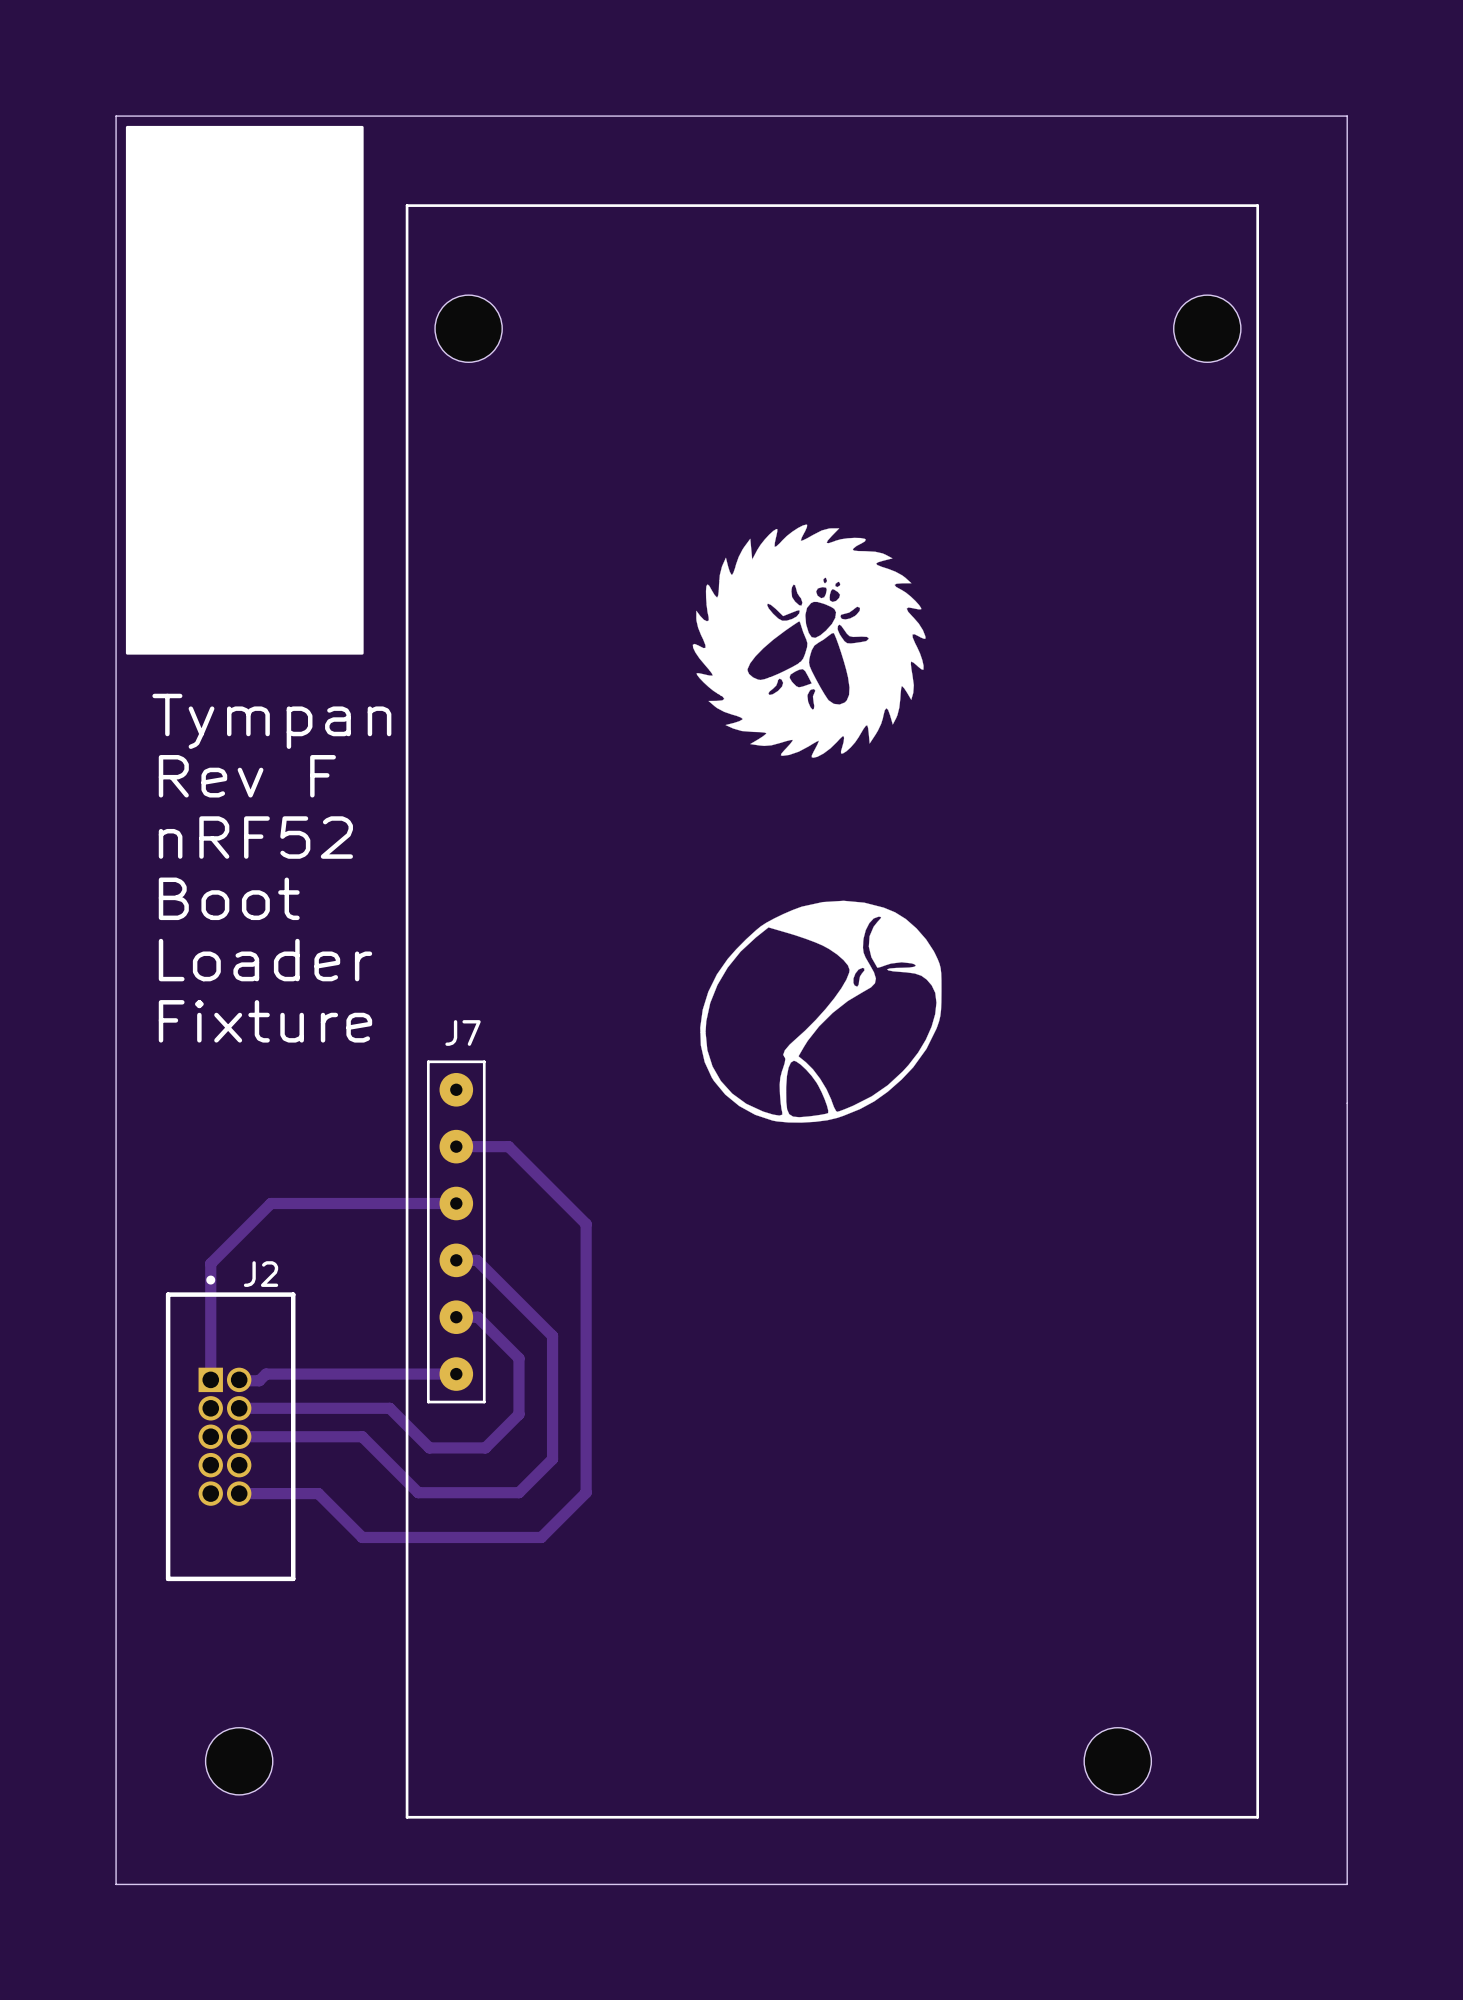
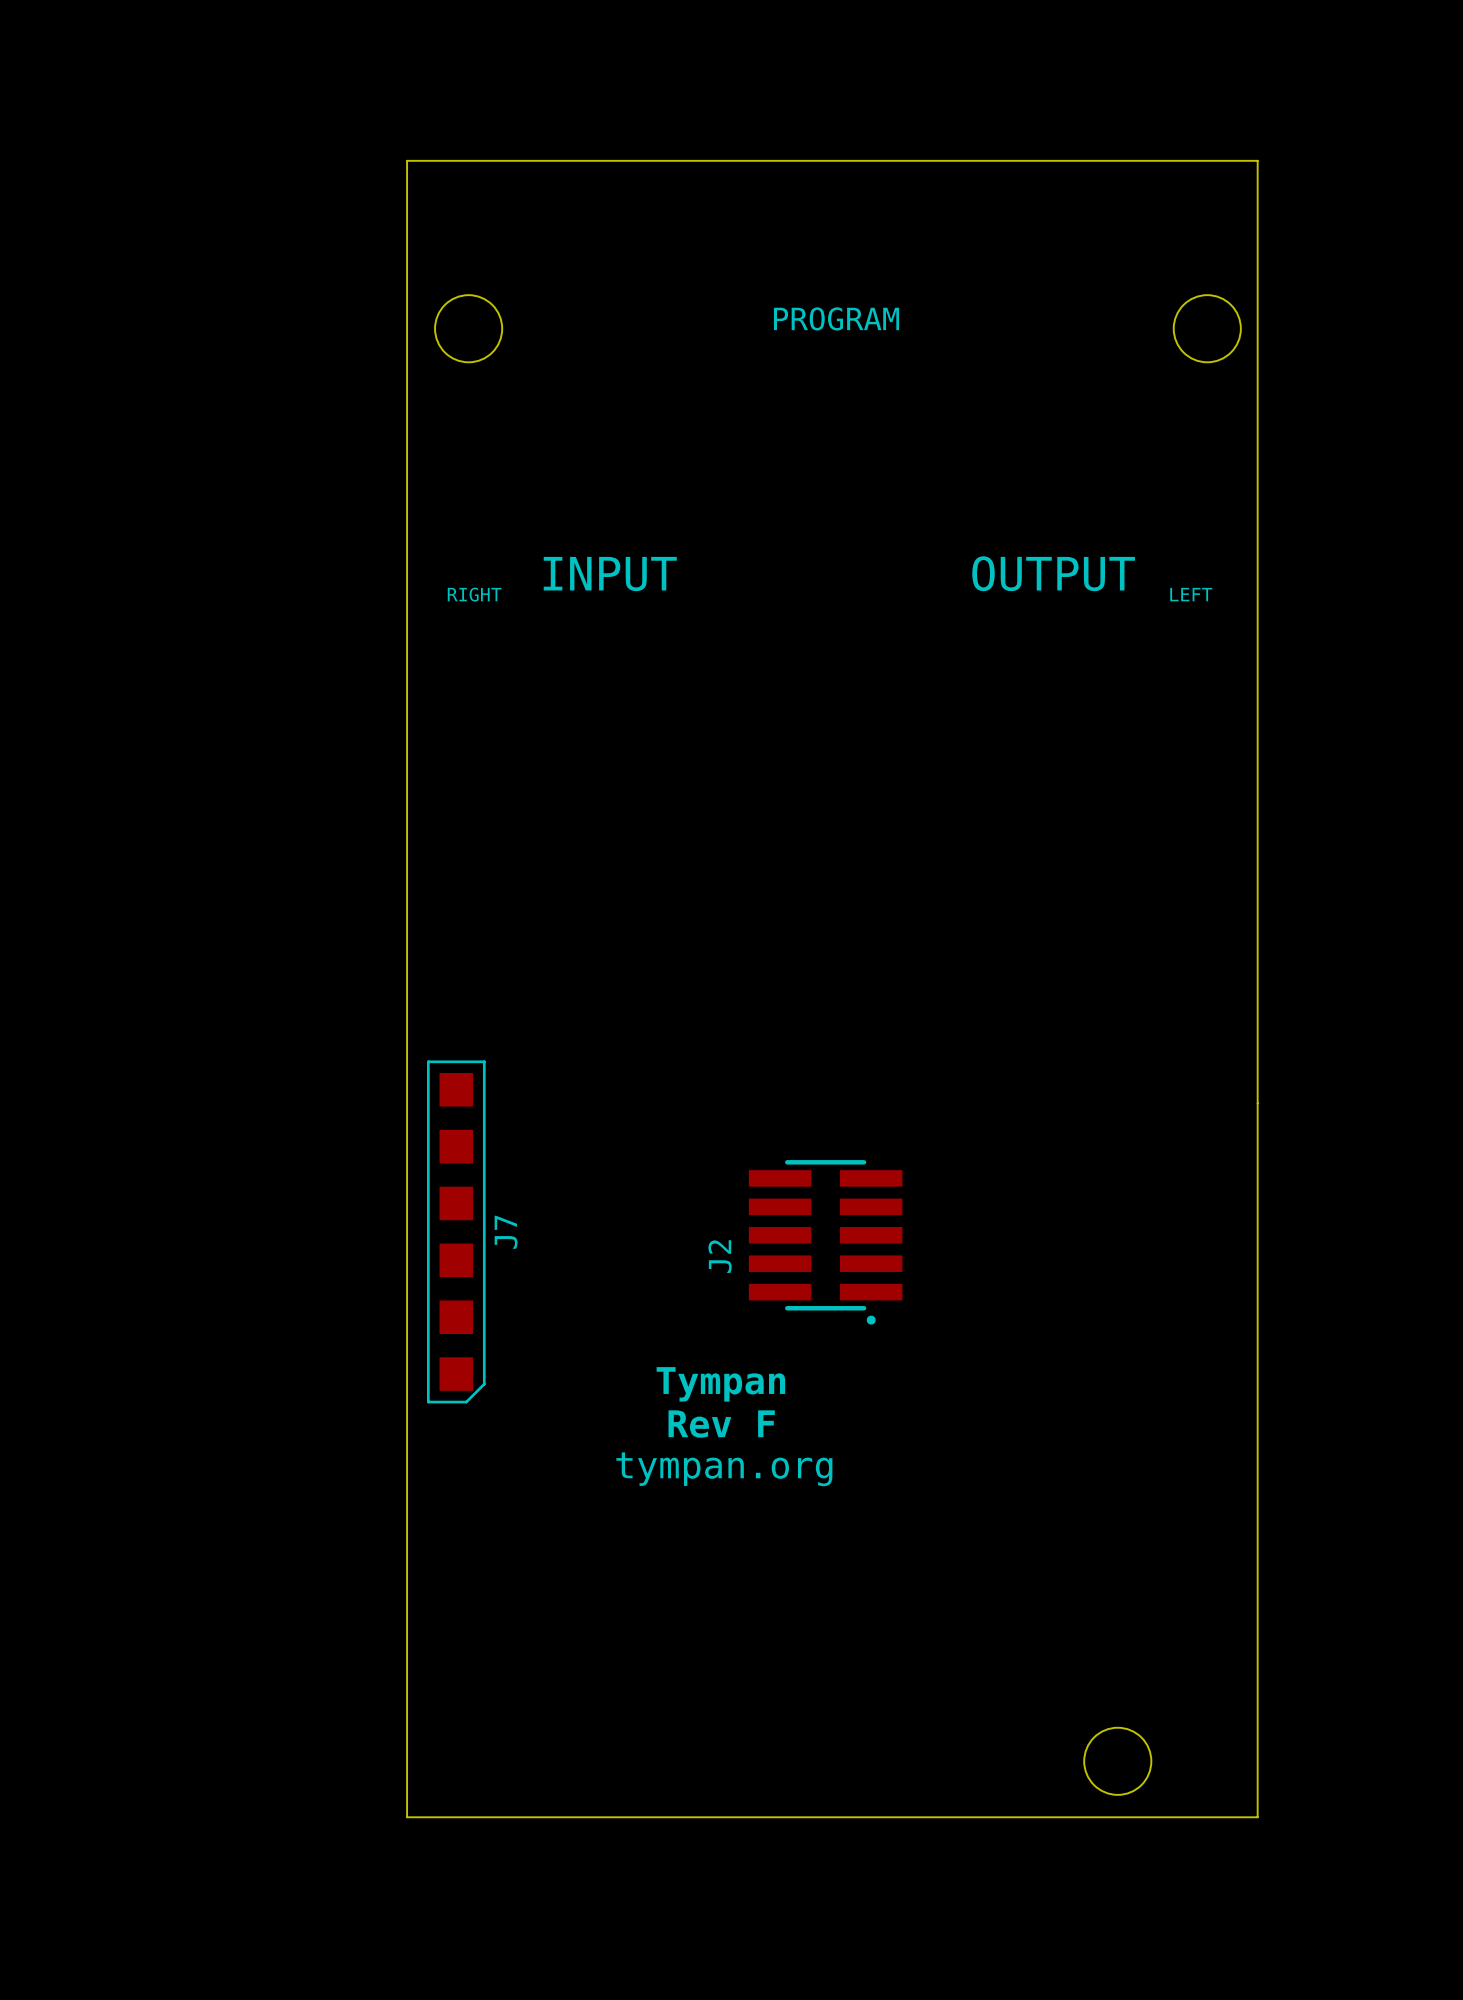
board edge: (116, 116) (116, 1884) (1347, 1884) (1347, 116) (116, 116) -> (407, 160) (407, 1817) (1257, 1817) (1257, 160) (407, 160)
drawing: [125, 125, 364, 655] -> none
line: (407, 205) (1257, 205) (1257, 1817) (407, 1817) (407, 205) -> none
text: none -> PROGRAM (836, 318)
drawing: [692, 524, 926, 758] -> none
text: none -> INPUT (610, 574)
text: none -> OUTPUT (1053, 573)
text: none -> RIGHT (474, 594)
text: none -> LEFT (1191, 594)
text: Tympan (271, 721) -> none
text: Rev F (247, 776) -> none
text: nRF52 (255, 837) -> none
text: Boot (229, 898) -> none
drawing: [700, 900, 942, 1123] -> none
text: Loader (265, 960) -> none
text: Fixture (265, 1021) -> none
J7 name position: J7 (463, 1032) -> J7 (506, 1232)
J7 footprint: [426, 1060, 486, 1404] -> [426, 1060, 486, 1404]
track: (456, 1146) (508, 1146) (586, 1224) (586, 1492) (541, 1537) (362, 1537) (318, 1493) (239, 1493) -> none
track: (456, 1203) (270, 1203) (210, 1263) (210, 1379) -> none
track: (456, 1260) (476, 1260) (552, 1336) (552, 1459) (518, 1492) (418, 1492) (362, 1436) (239, 1436) -> none
J2 name position: J2 (261, 1274) -> J2 (720, 1256)
J2 footprint: [165, 1275, 296, 1582] -> [748, 1160, 903, 1325]
track: (456, 1317) (477, 1317) (518, 1358) (518, 1414) (485, 1447) (429, 1447) (389, 1408) (239, 1408) -> none
track: (456, 1374) (266, 1374) (259, 1380) (239, 1379) -> none
text: none -> Tympan (720, 1384)
text: none -> Rev F (721, 1424)
text: none -> tympan.org (724, 1469)
part: (239, 1761) -> none

